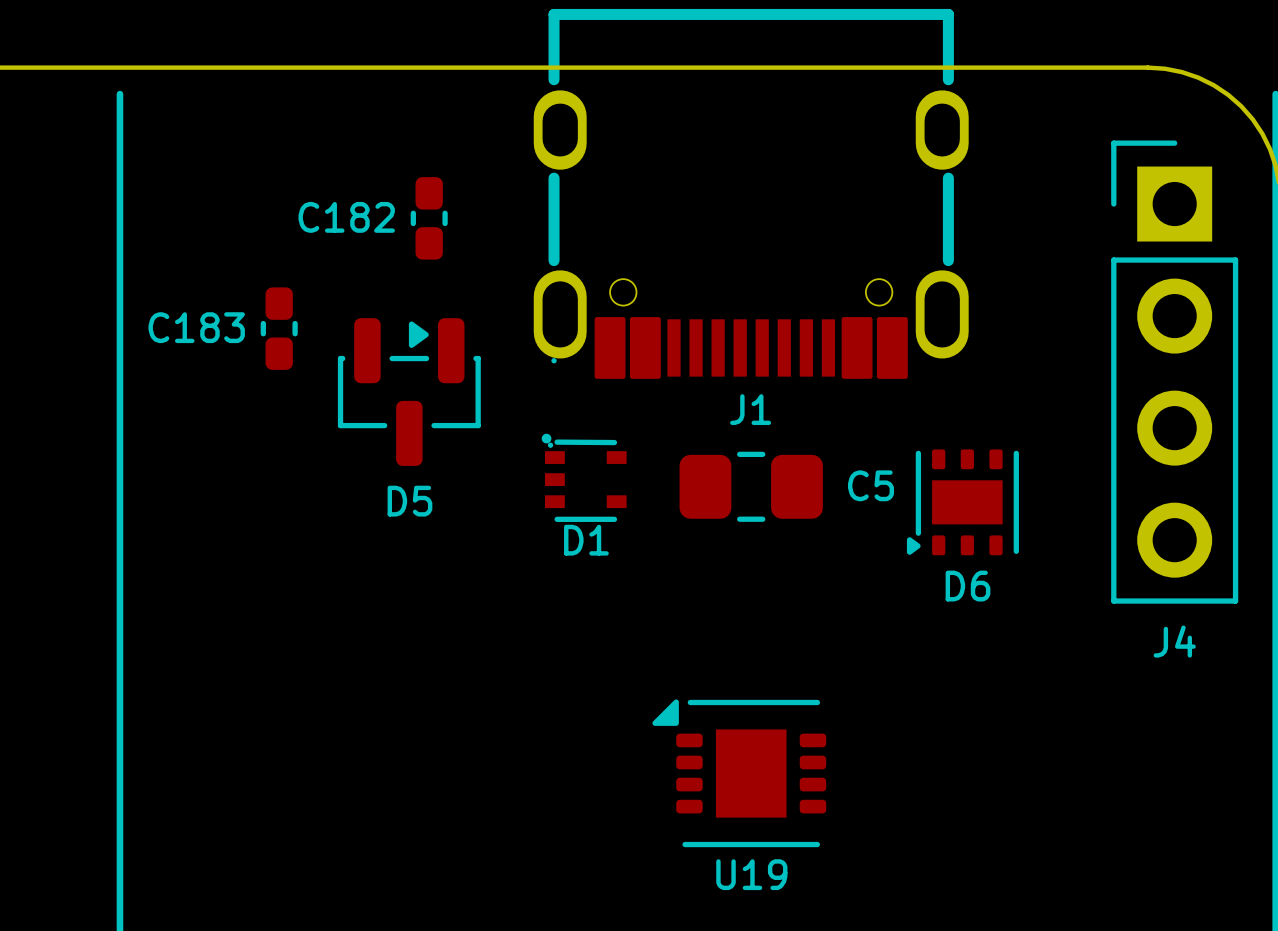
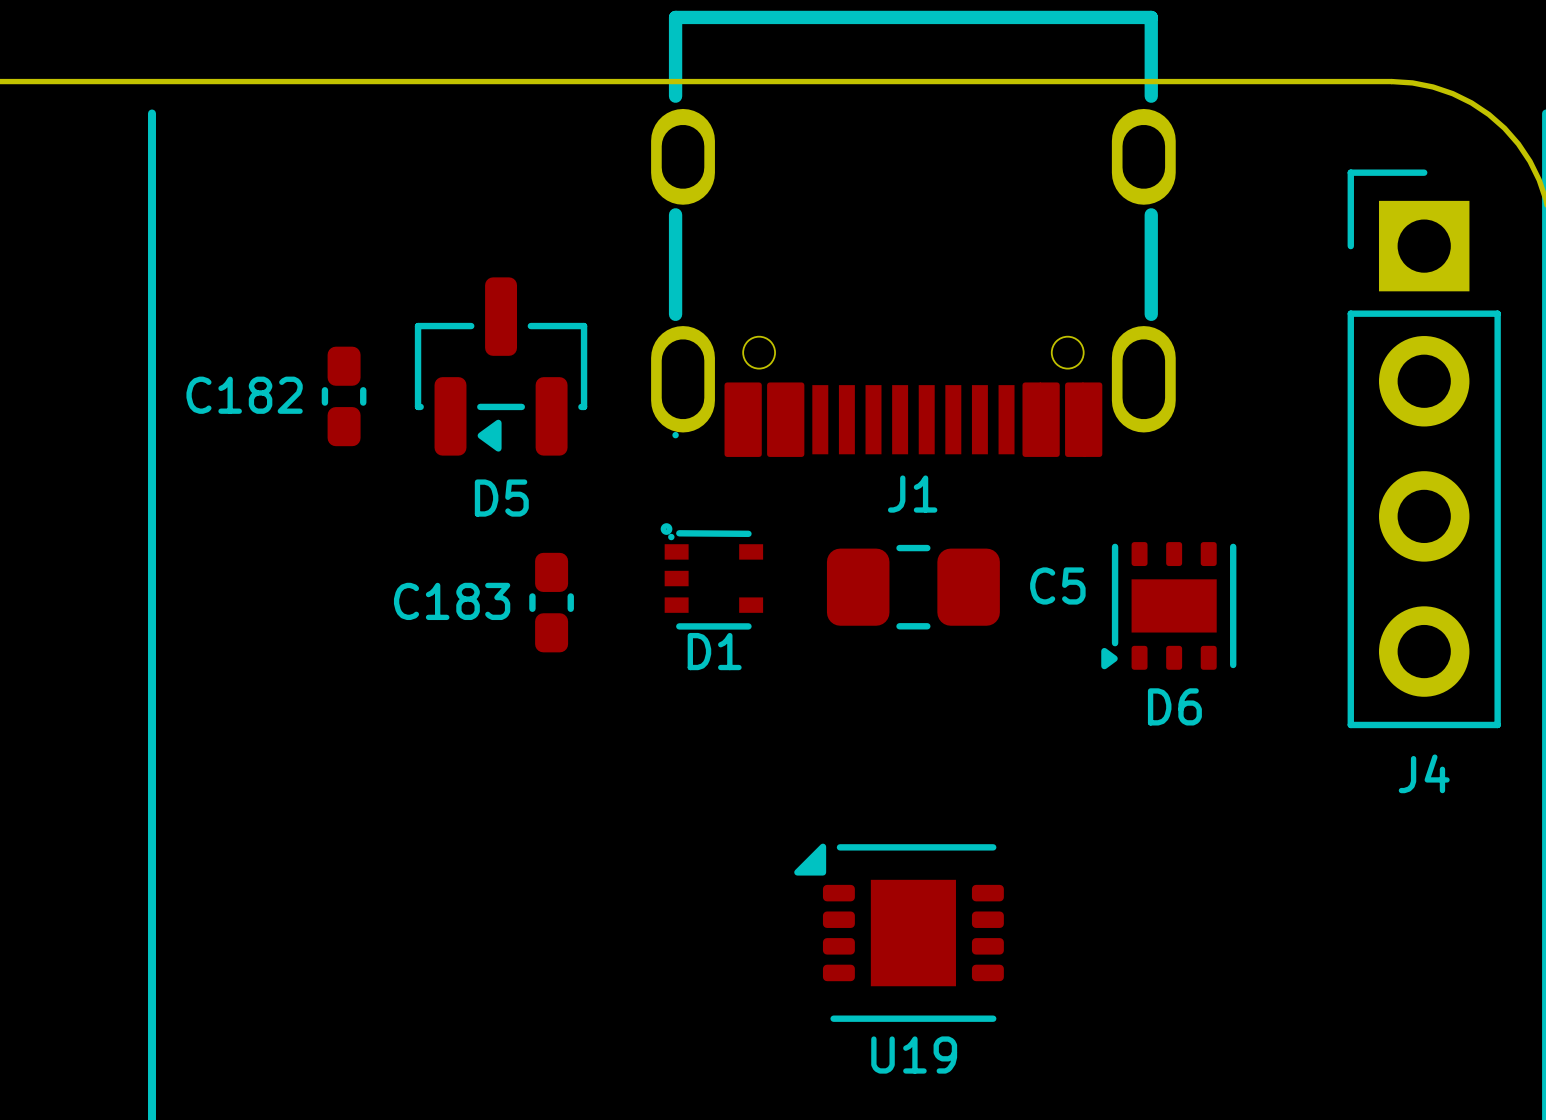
C182: (429, 218) -> none
C183 name: C183 (196, 327) -> C182 (244, 395)
D5 rotation: 0° (409, 392) -> 180° (501, 366)
C183: none -> (551, 602)

